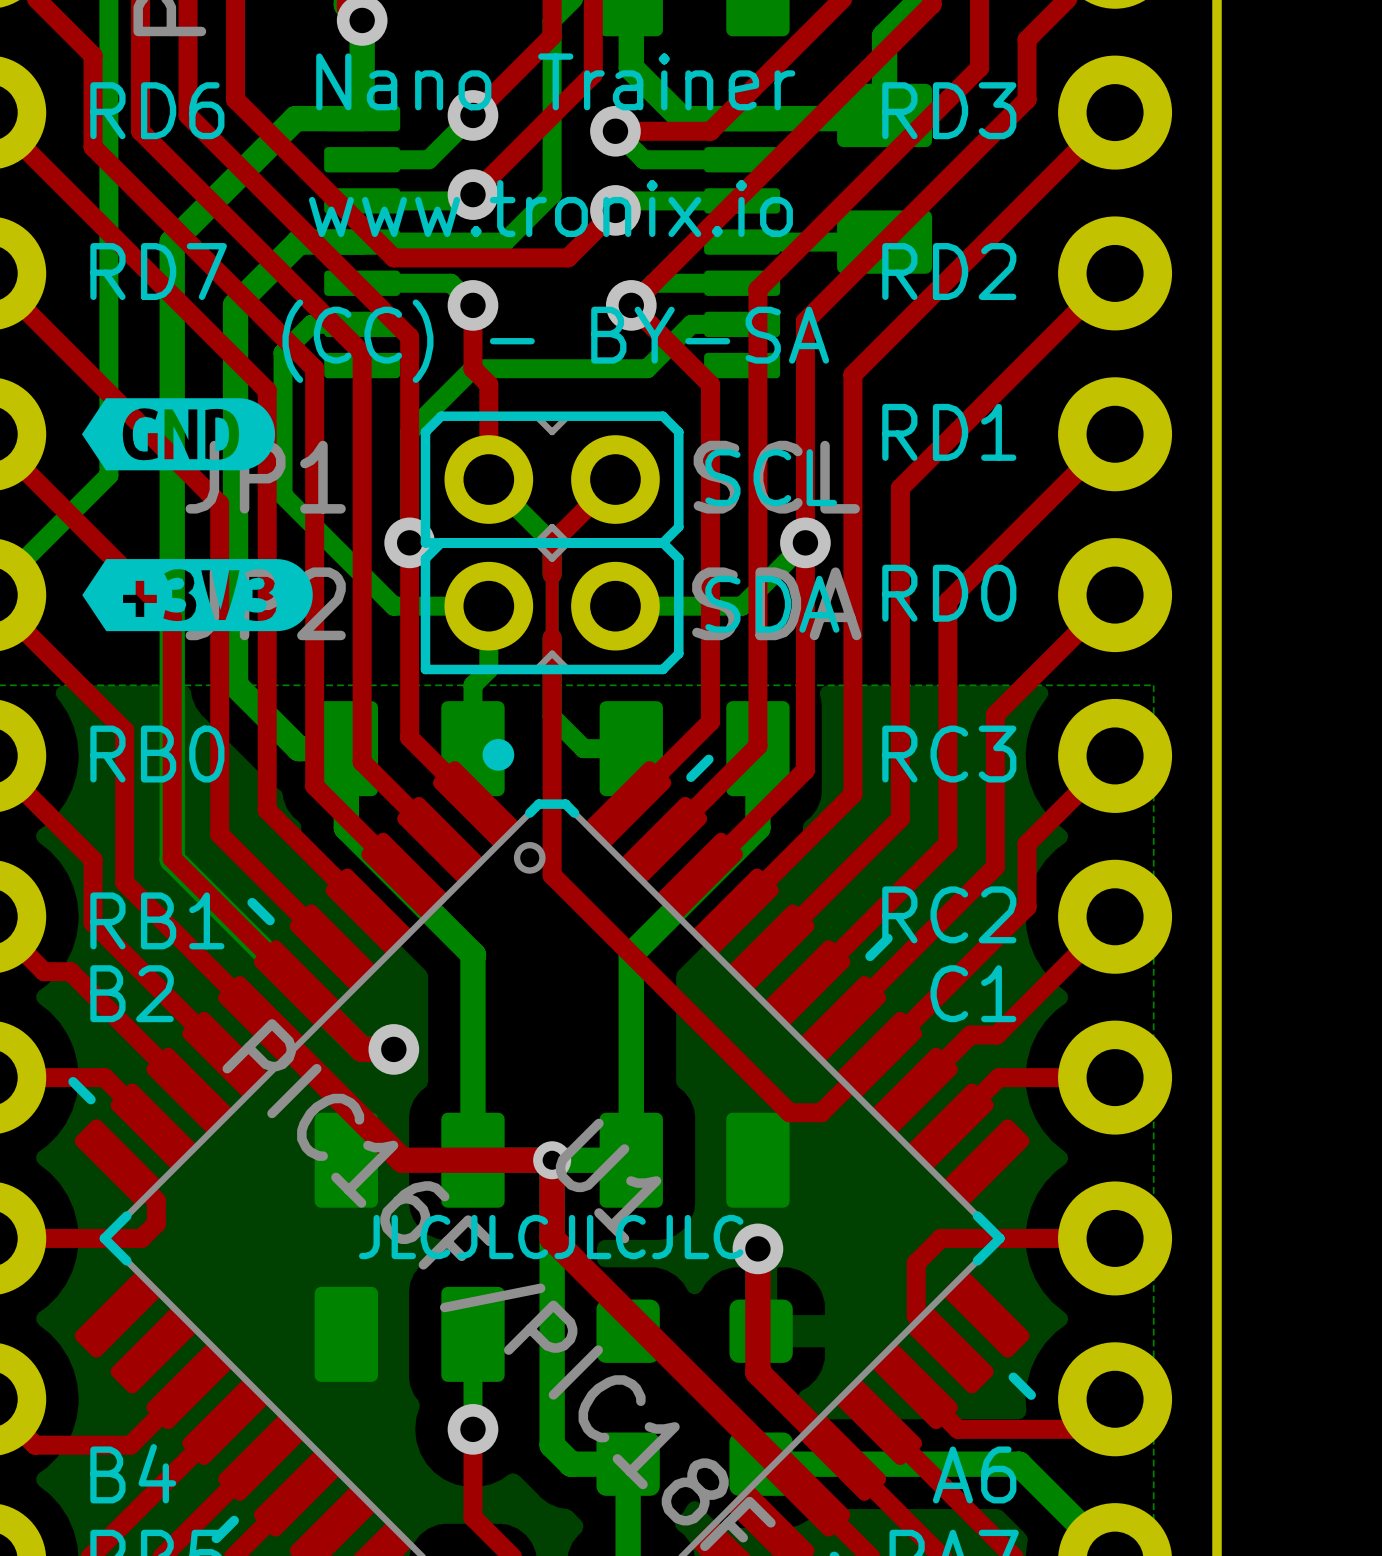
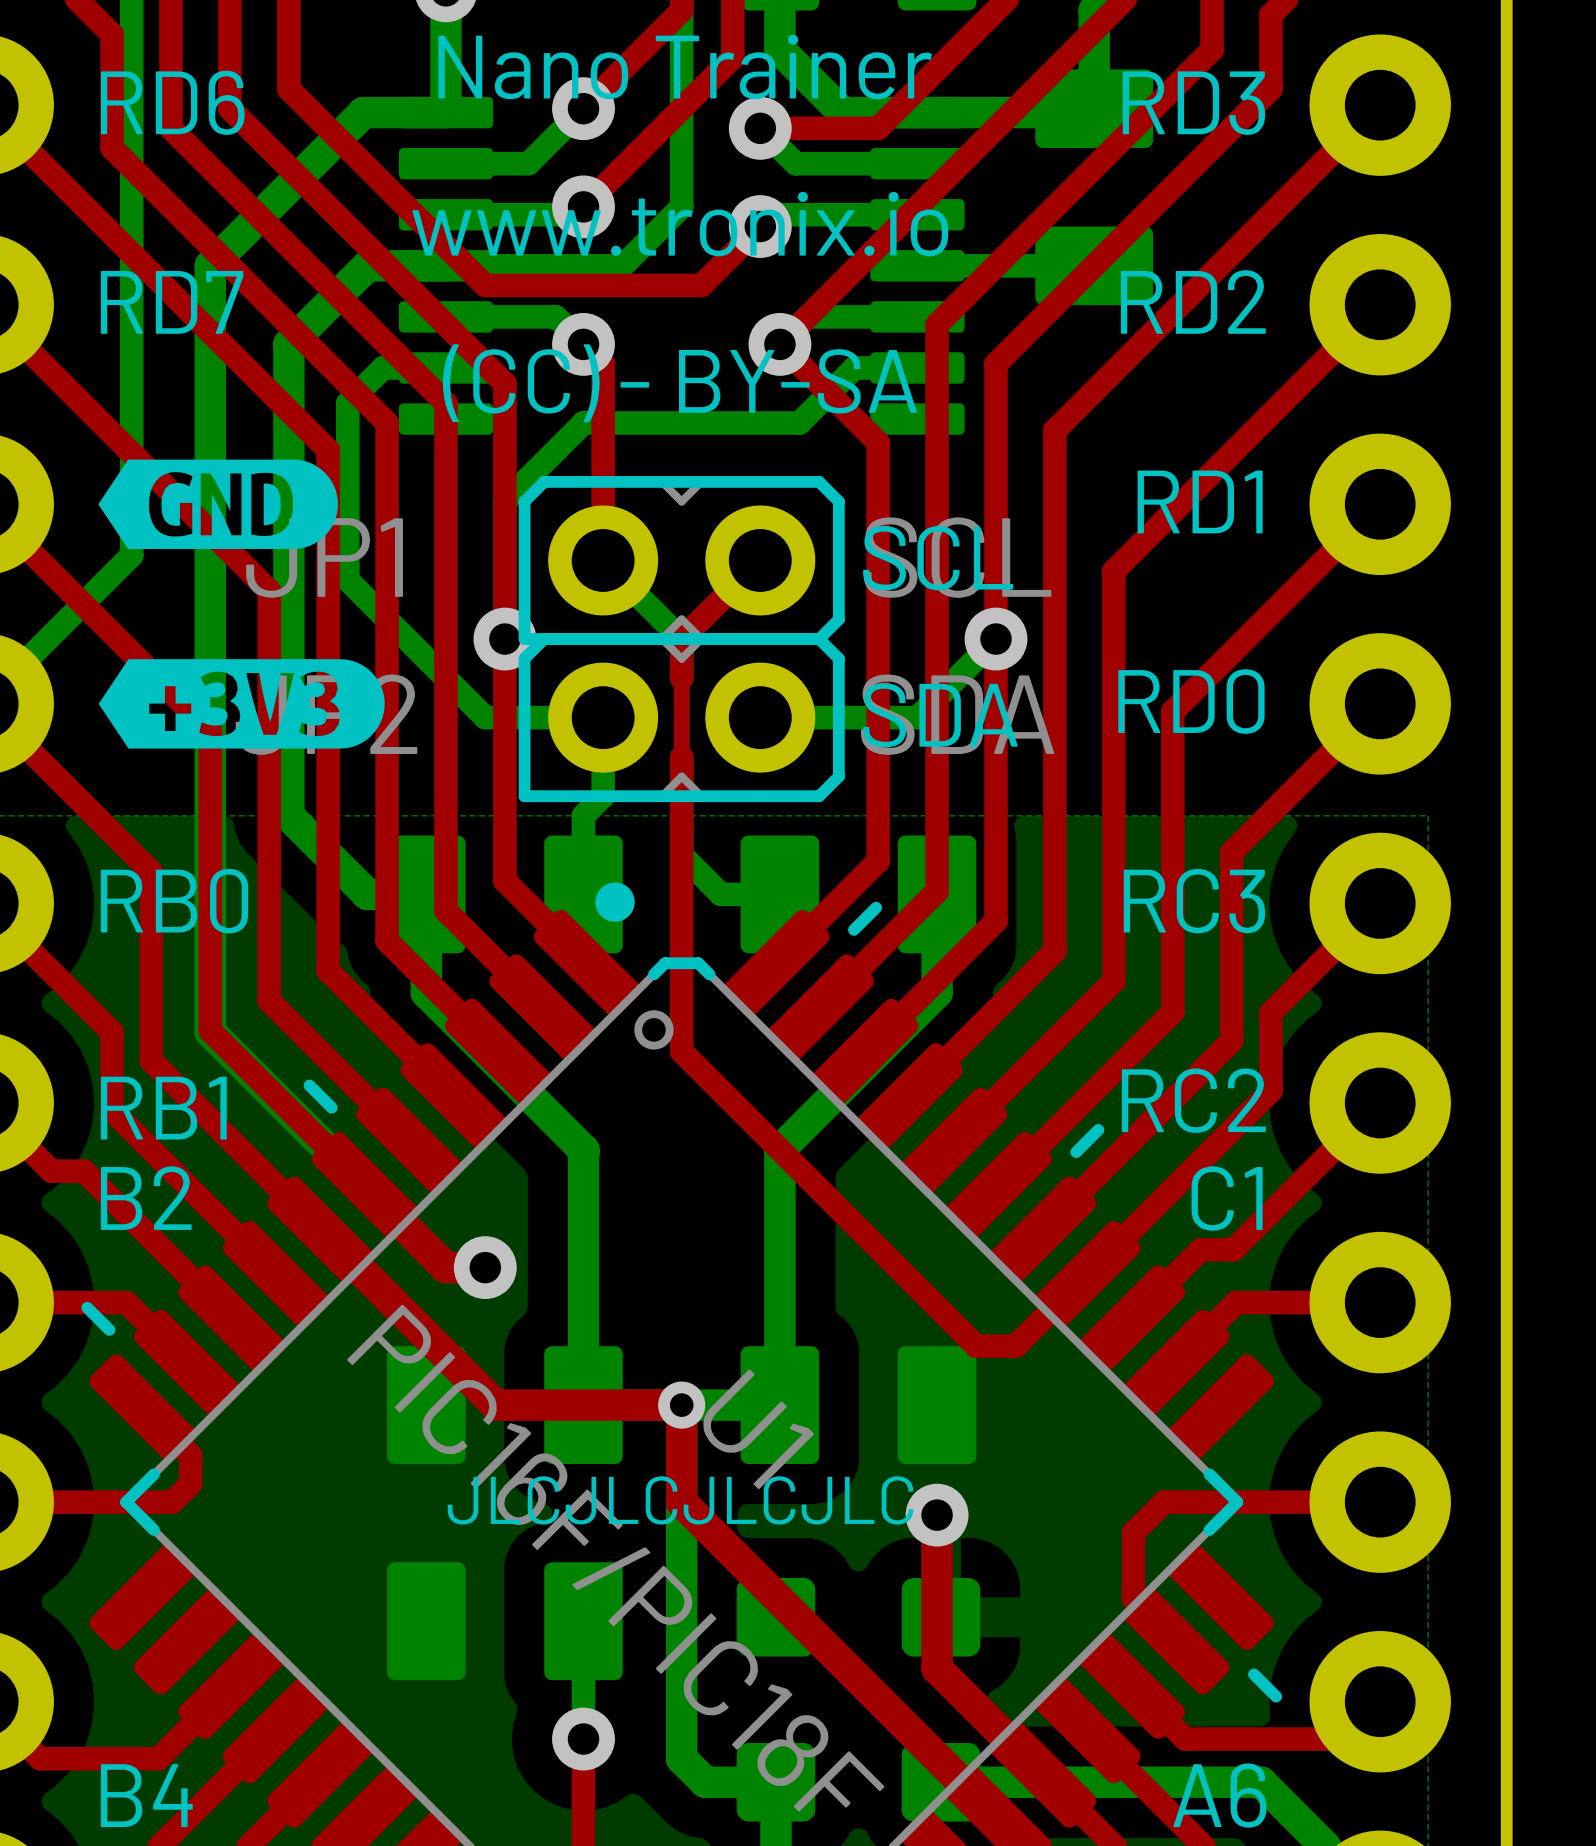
top track: (472, 305) (472, 368) (488, 384) -> (583, 344) (603, 364) (603, 442)

